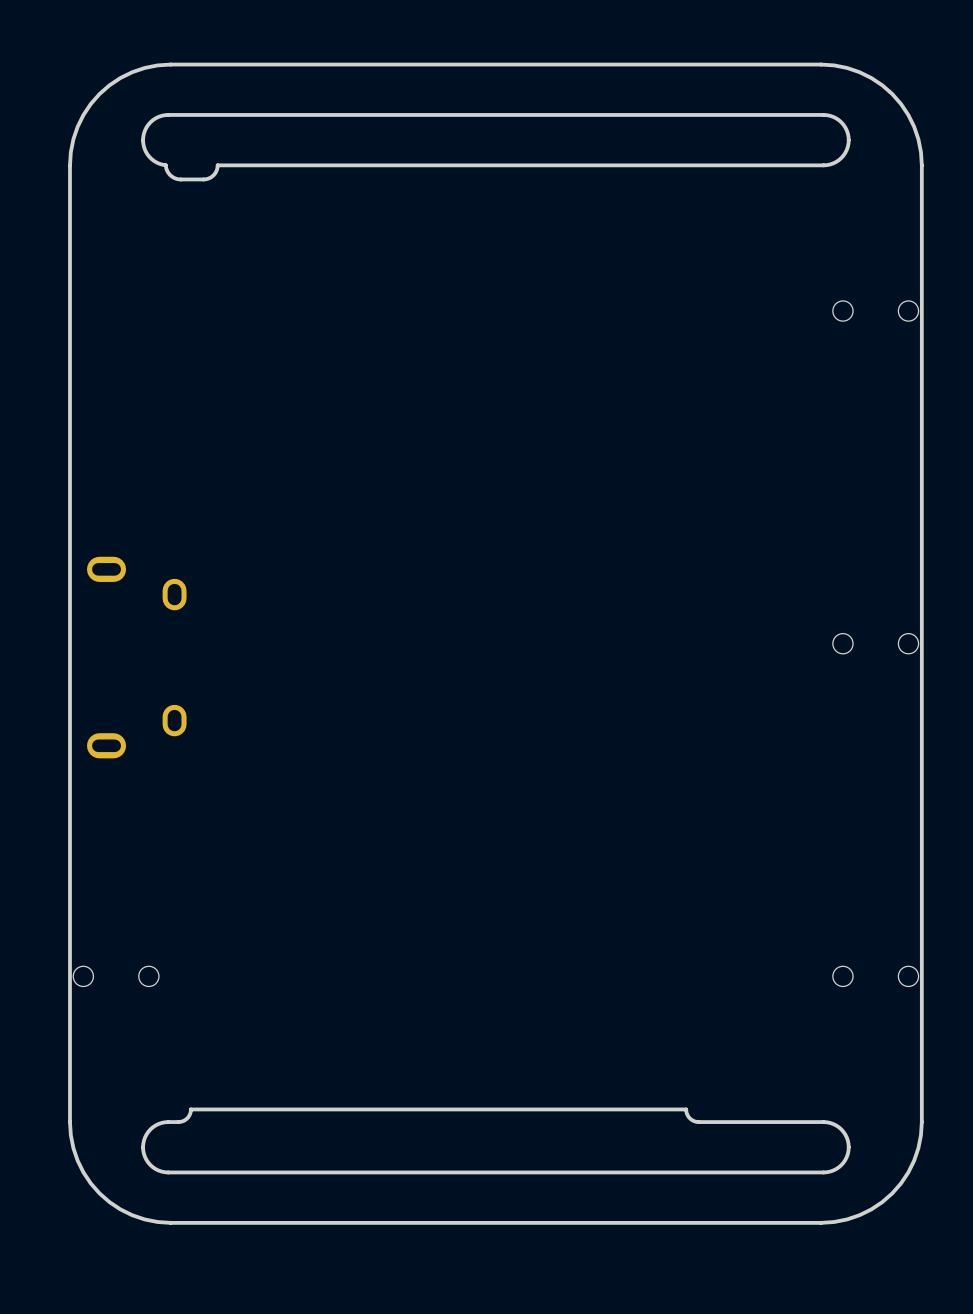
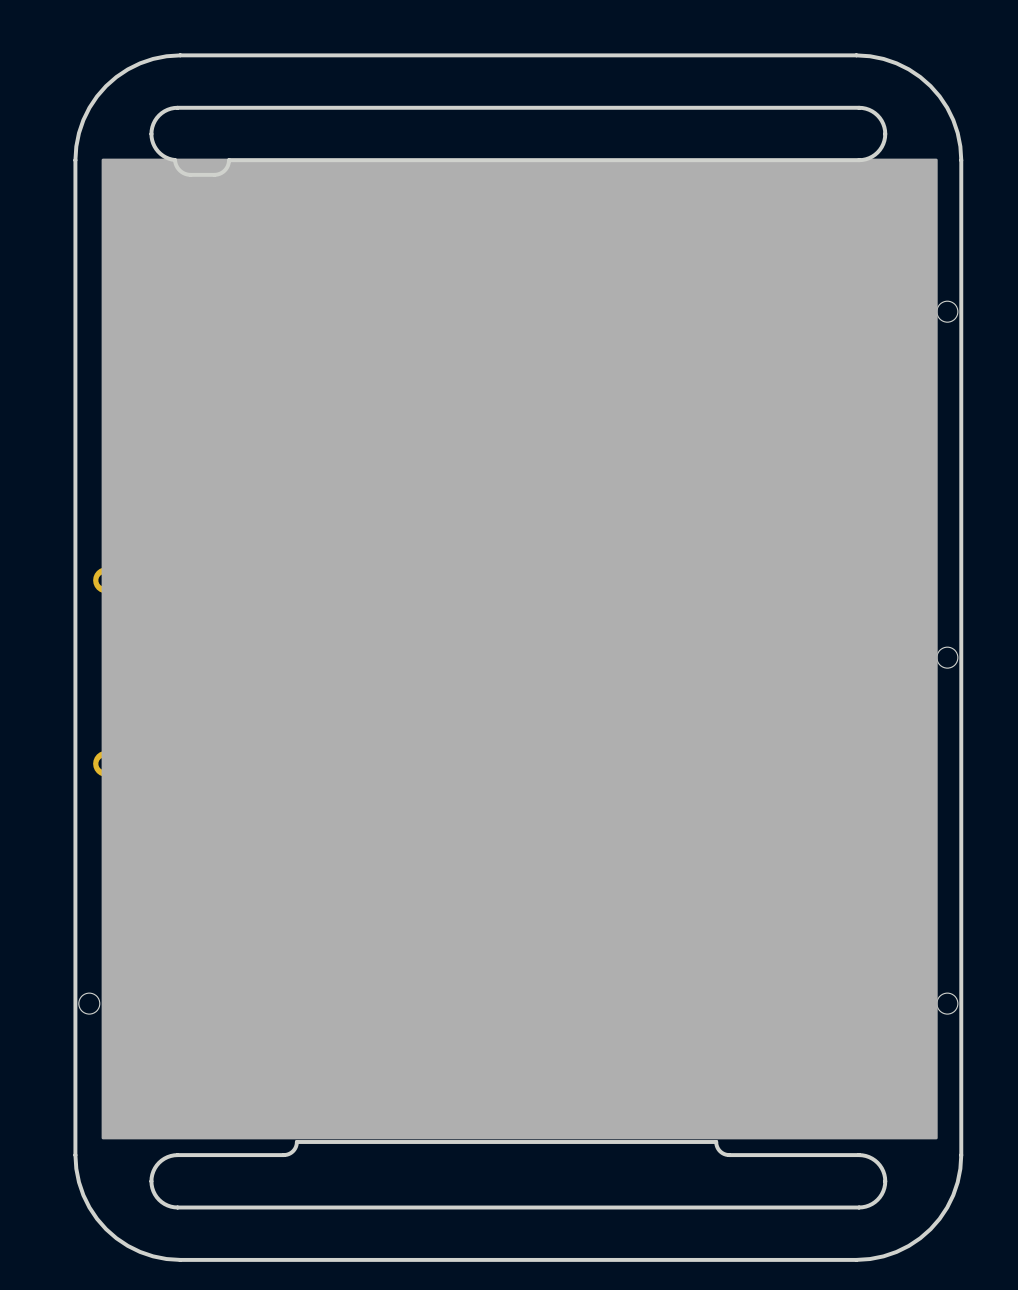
drawing: none -> [101, 158, 938, 1140]
board edge: (282, 1109) (190, 1109) (187, 1118) (178, 1122) -> (296, 1141) (294, 1149) (285, 1154) (188, 1155)

